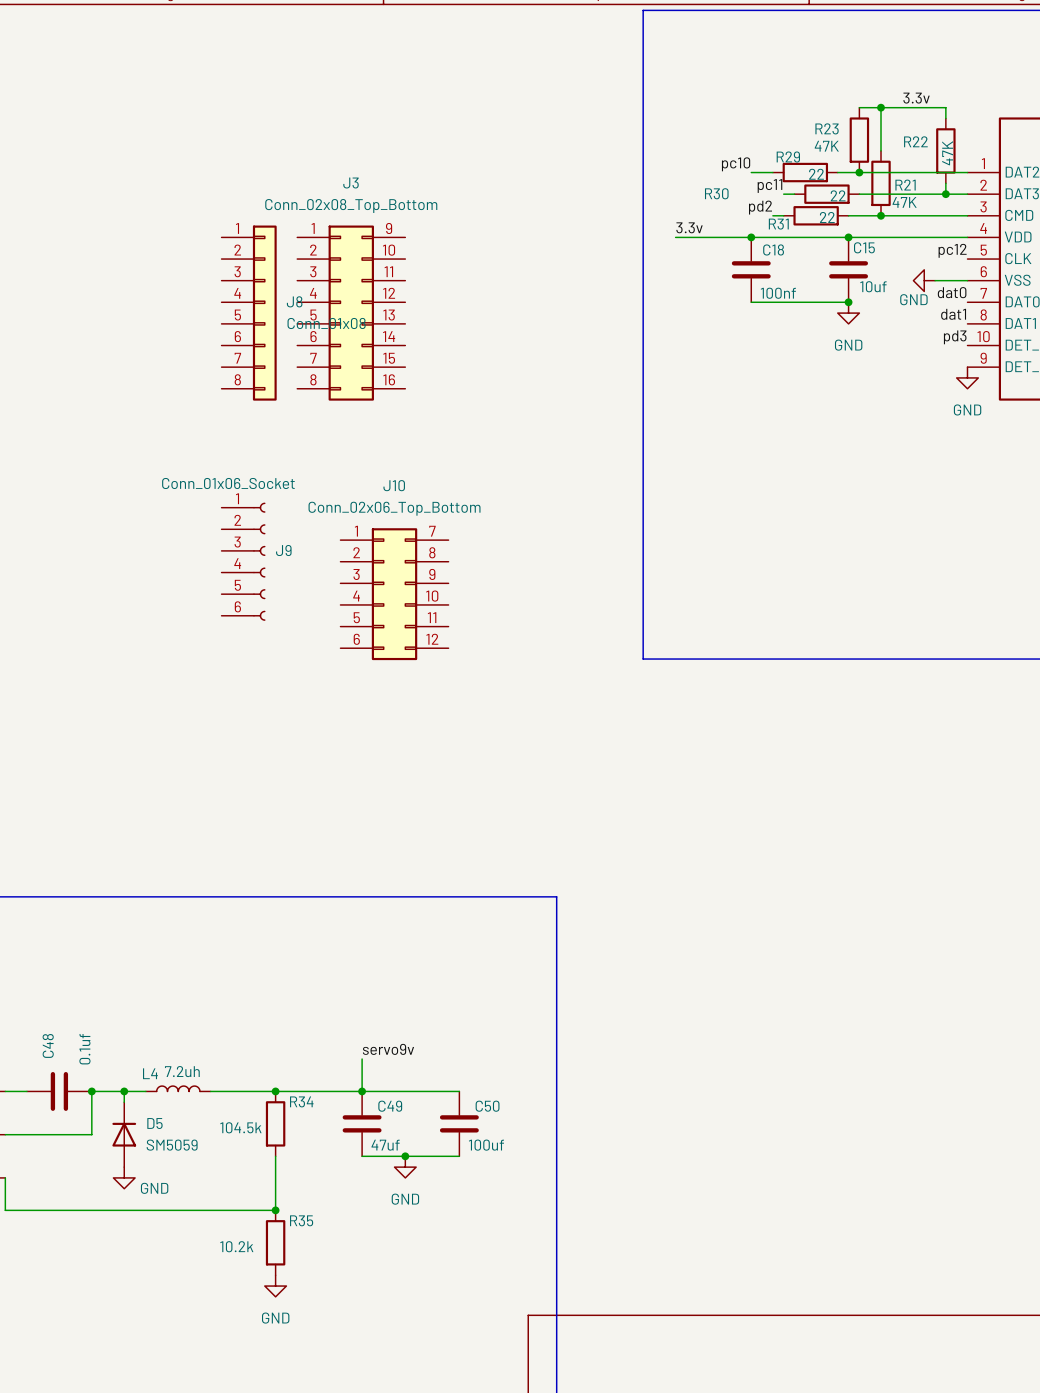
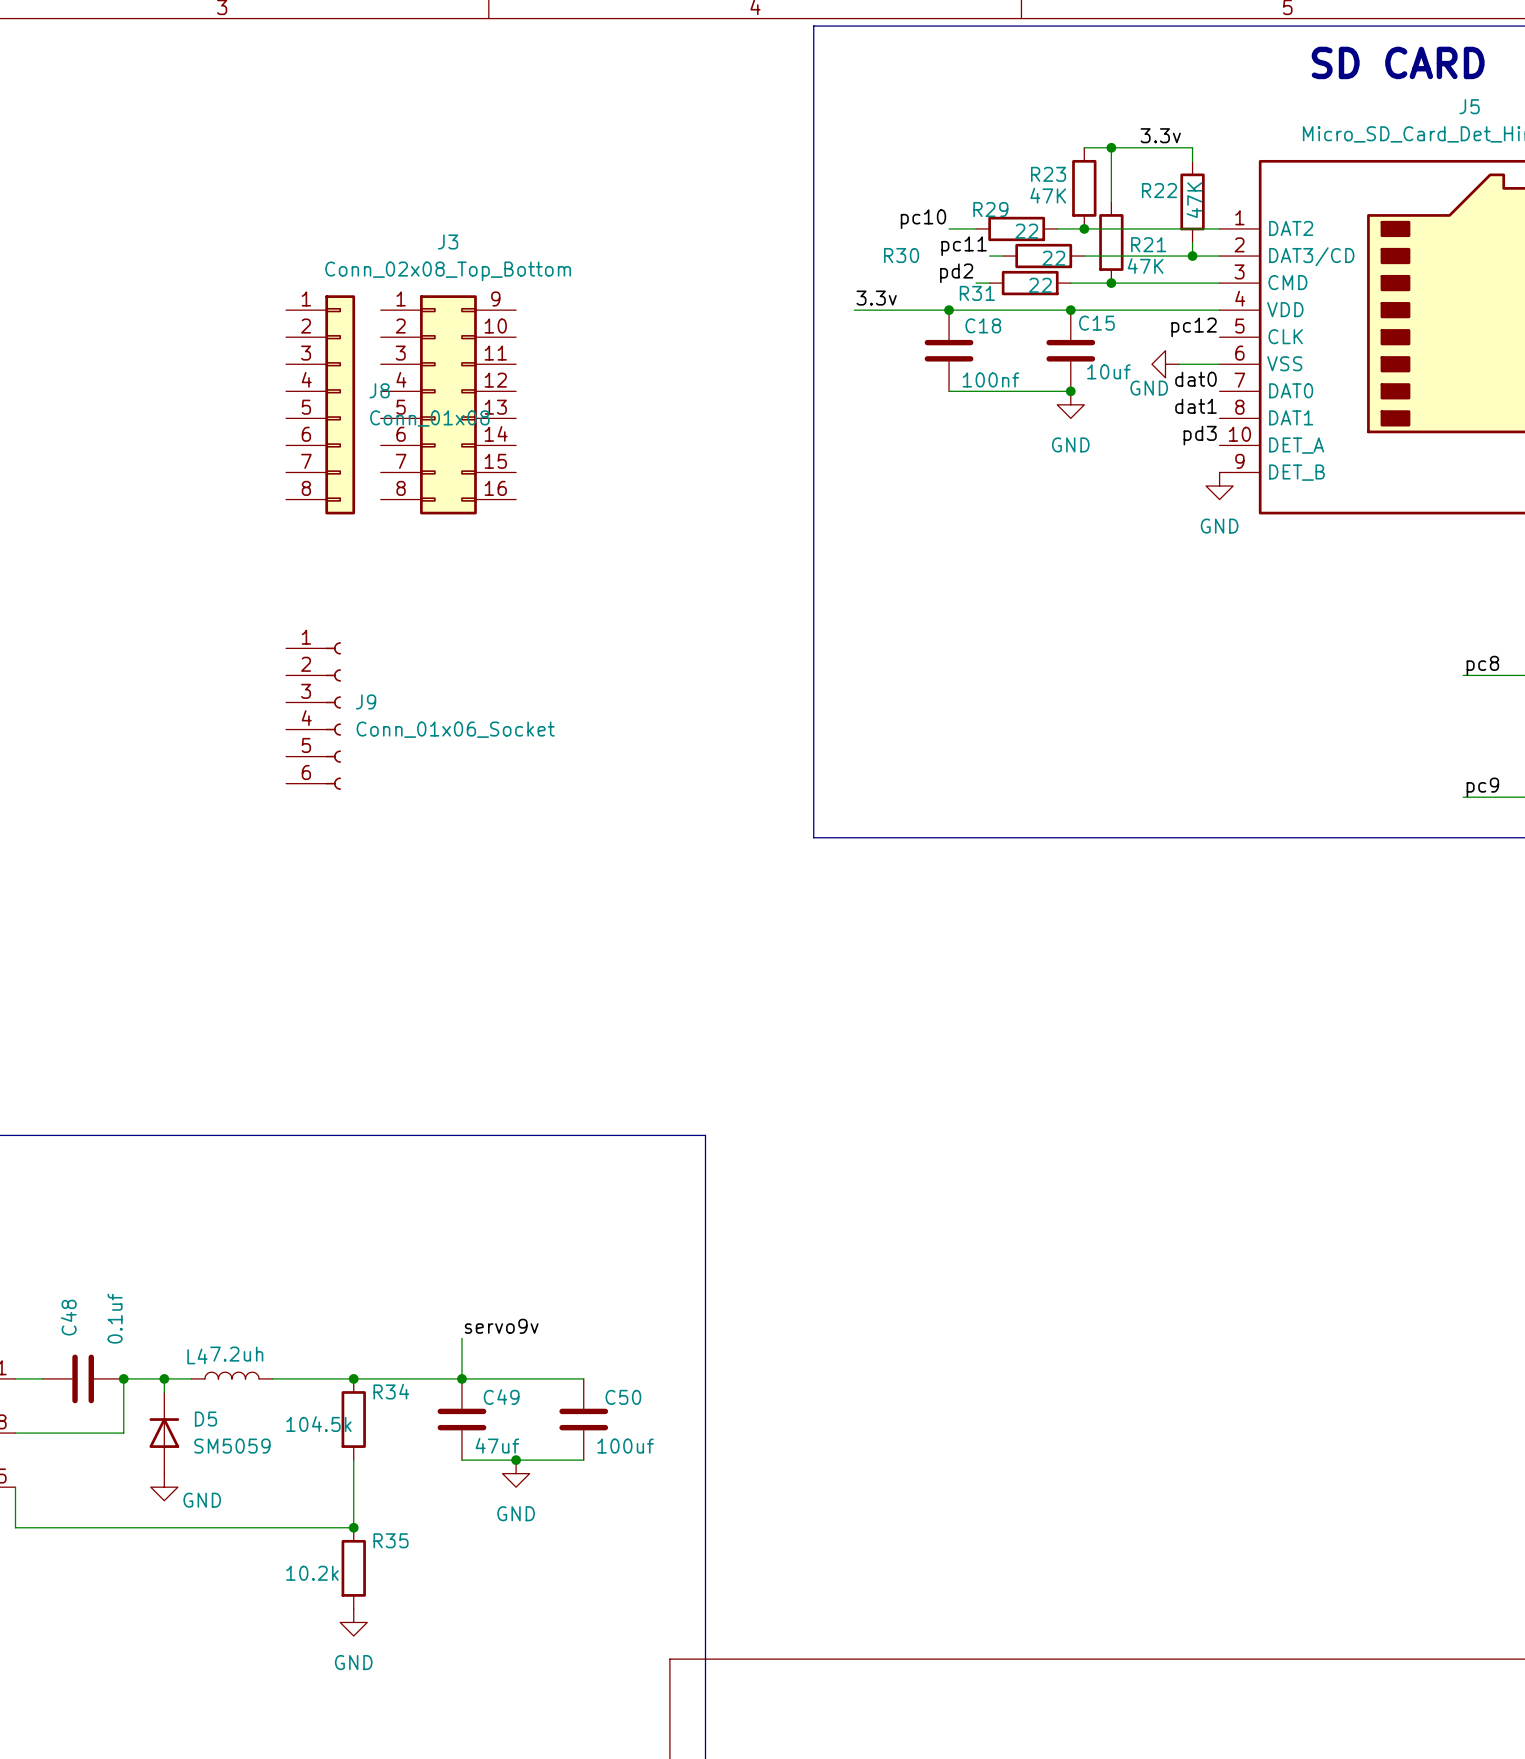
J9 value position: Conn_01x06_Socket (228, 483) -> Conn_01x06_Socket (455, 729)
J10: Conn_02x06_Top_Bottom (394, 594) -> none

